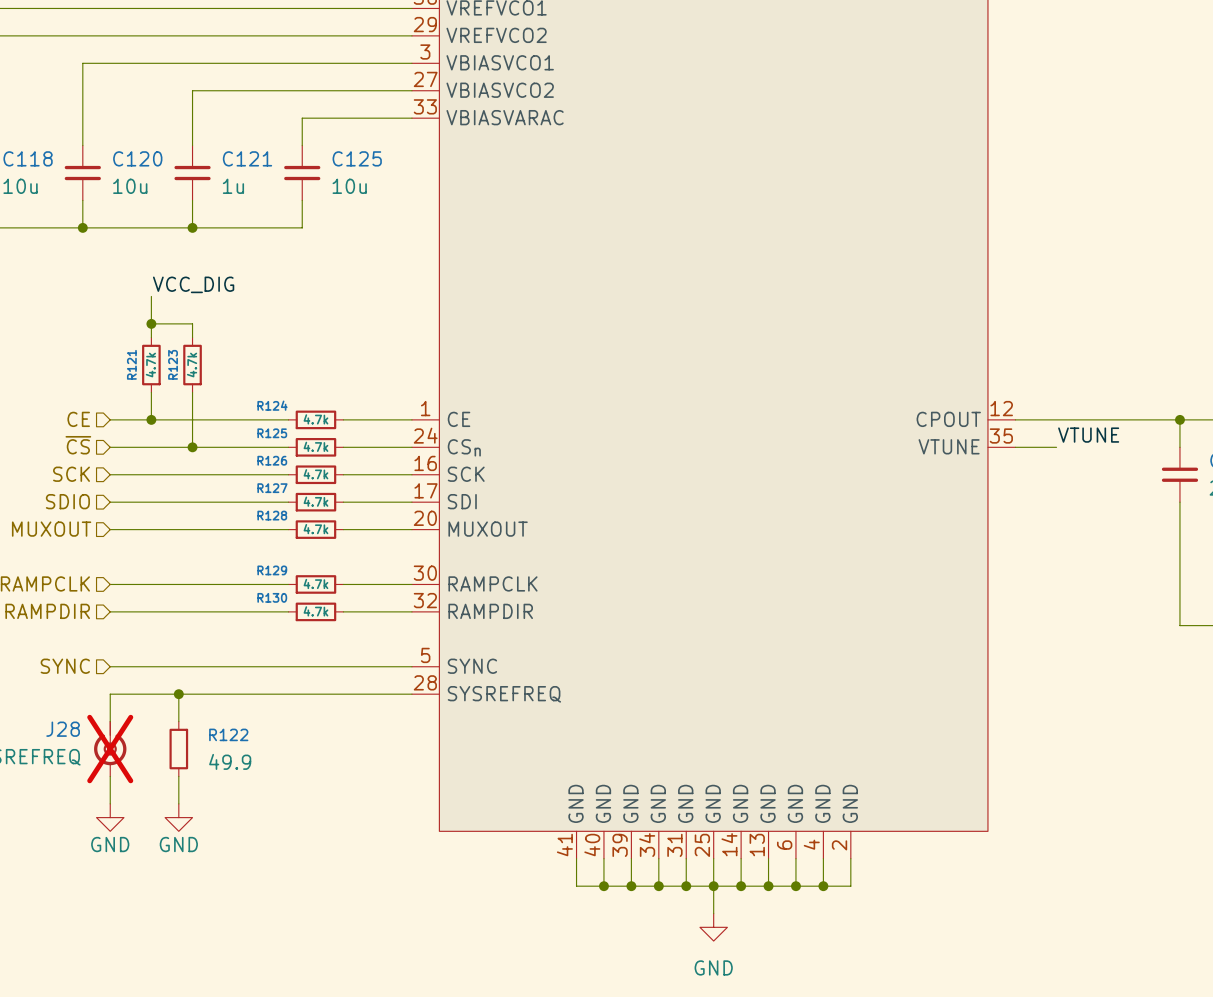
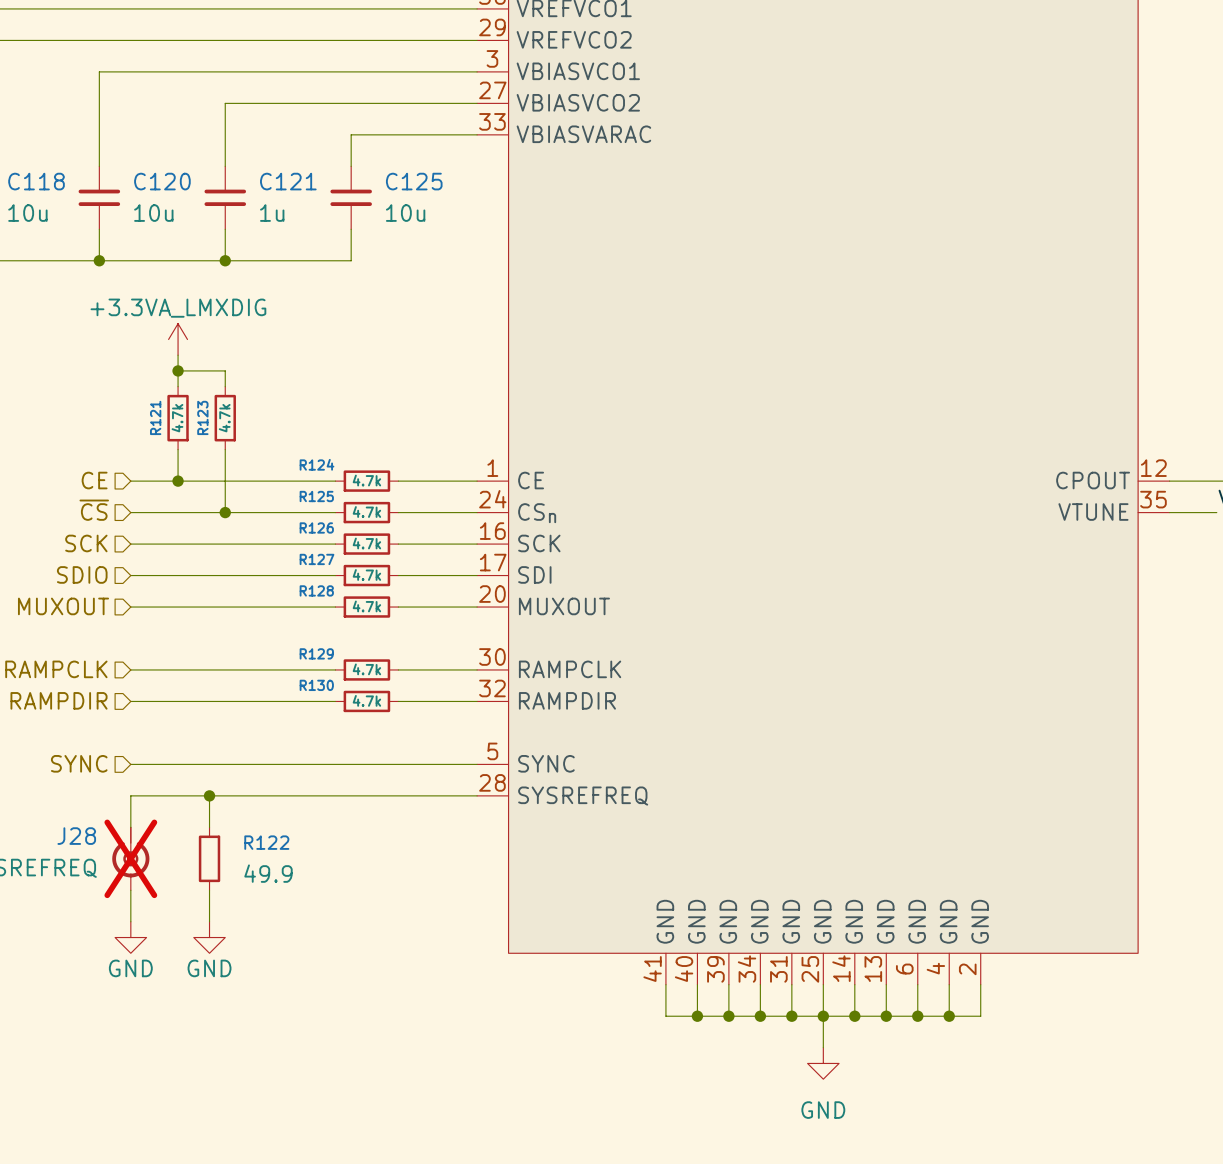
label: VCC_DIG (193, 284) -> none
power symbol: none -> +3.3VA_LMXDIG (178, 339)

